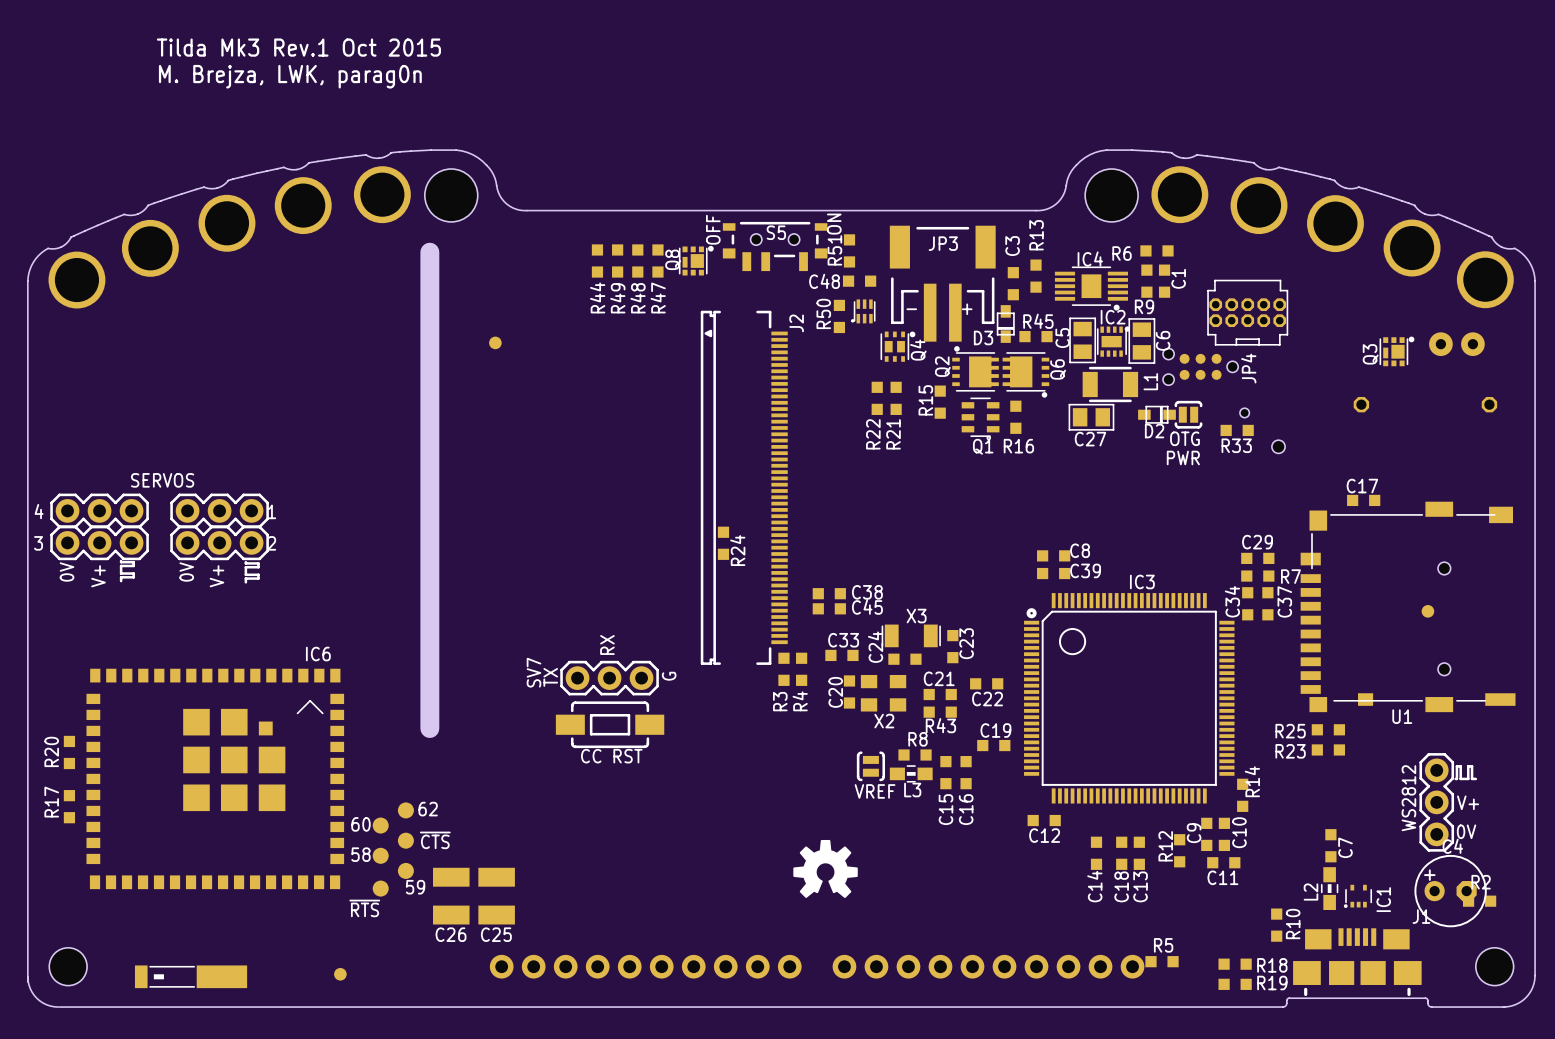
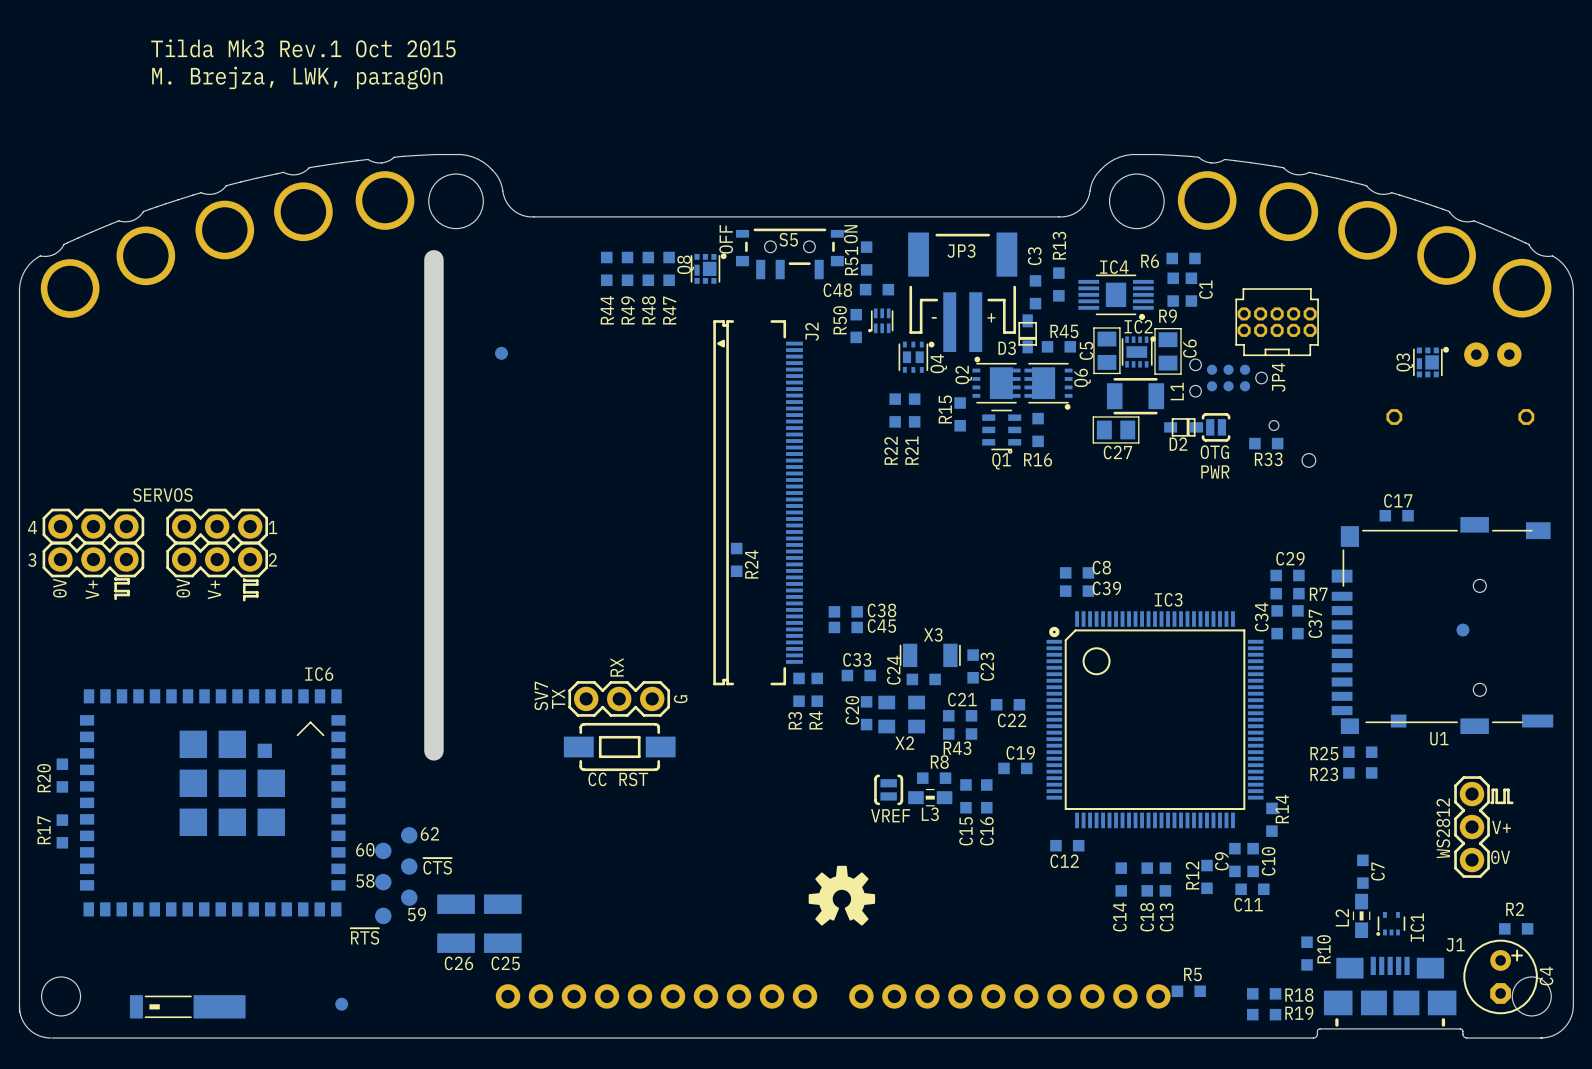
C4 rotation: 0° (1450, 891) -> 90° clockwise (1500, 976)
C4 position: (1450, 891) -> (1500, 976)

